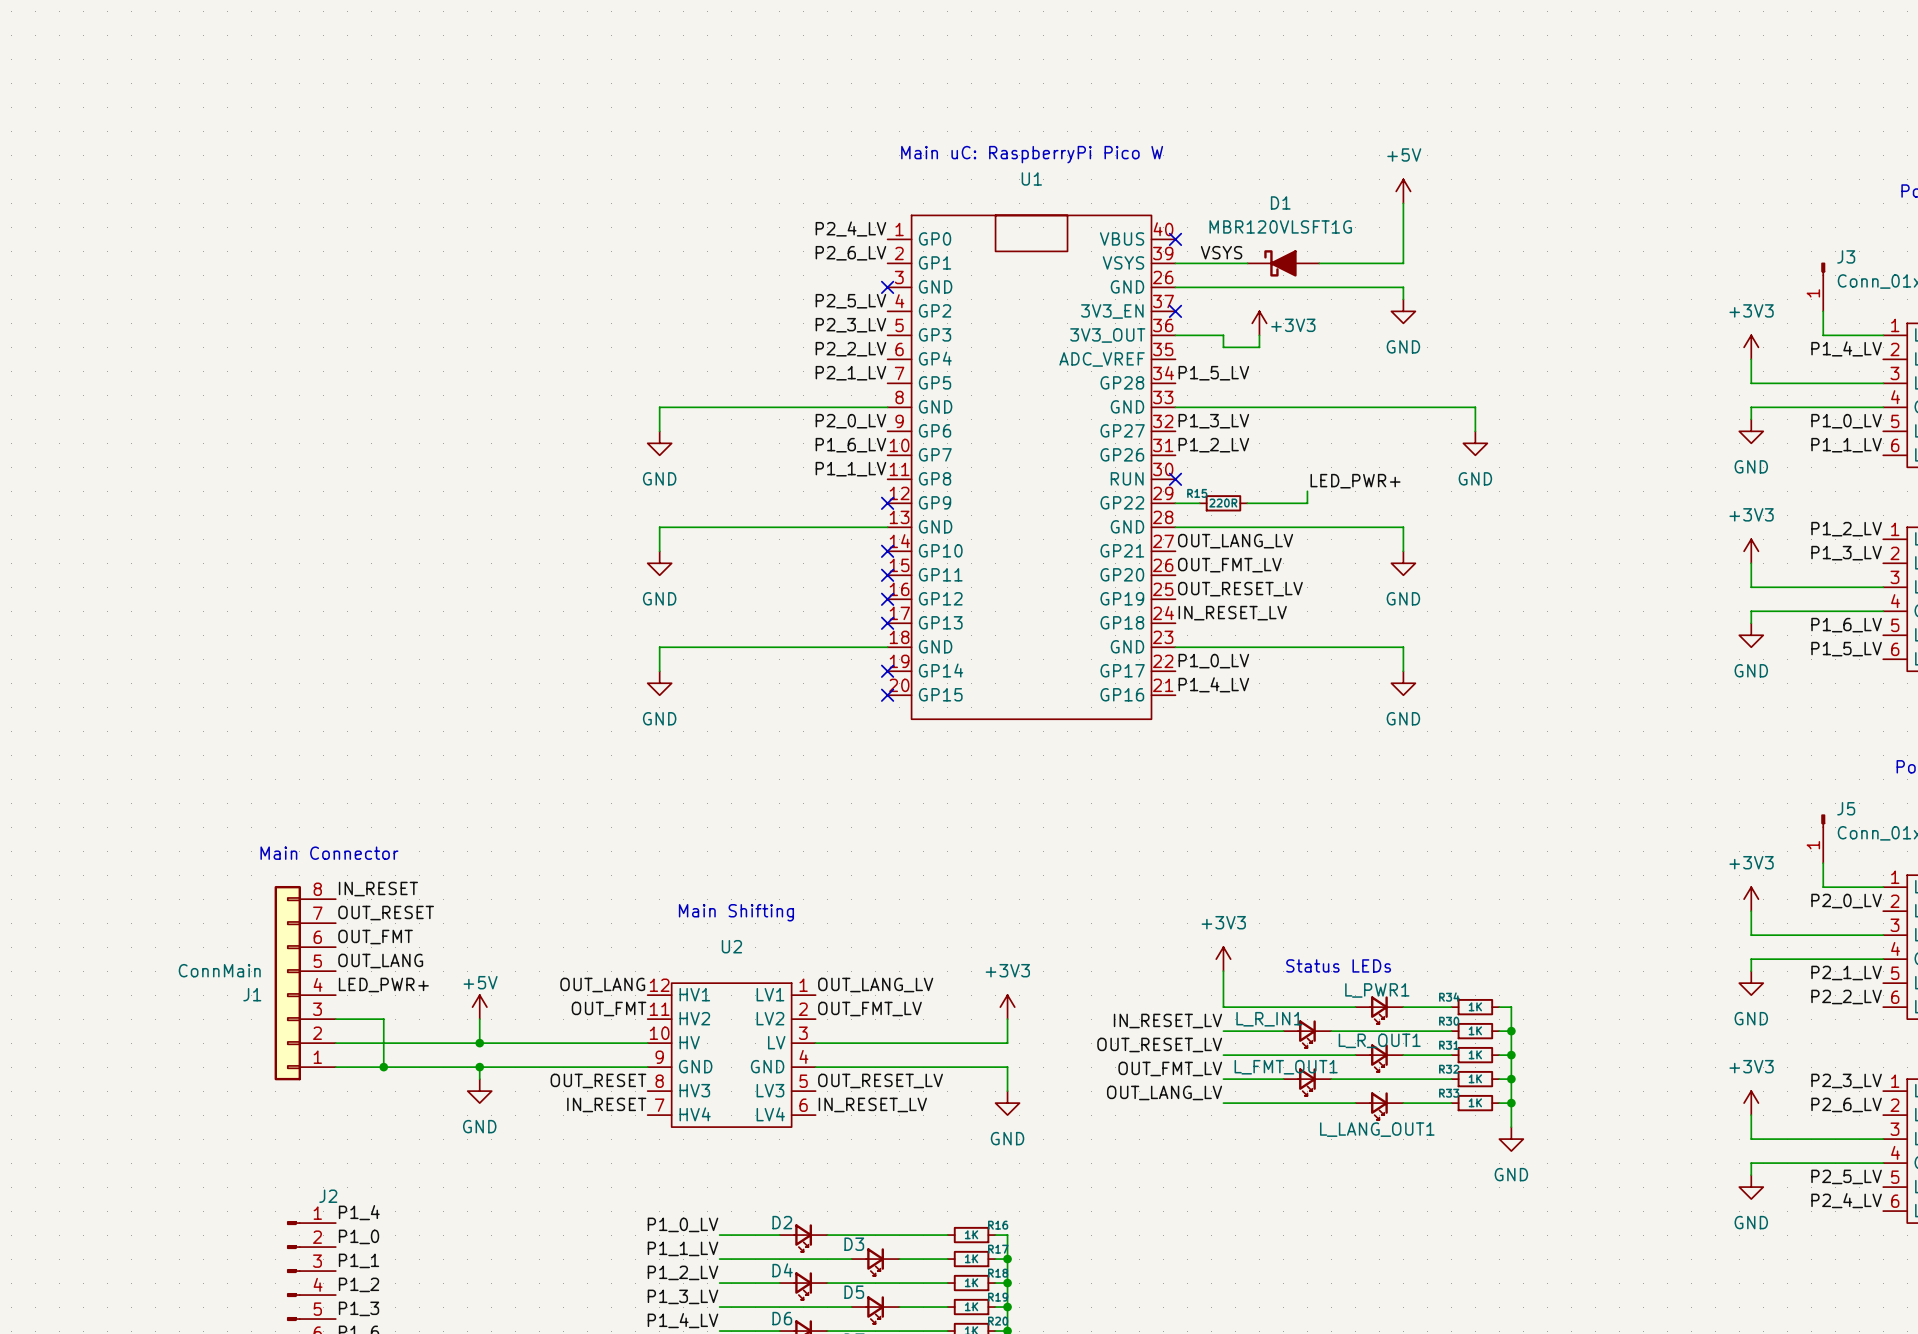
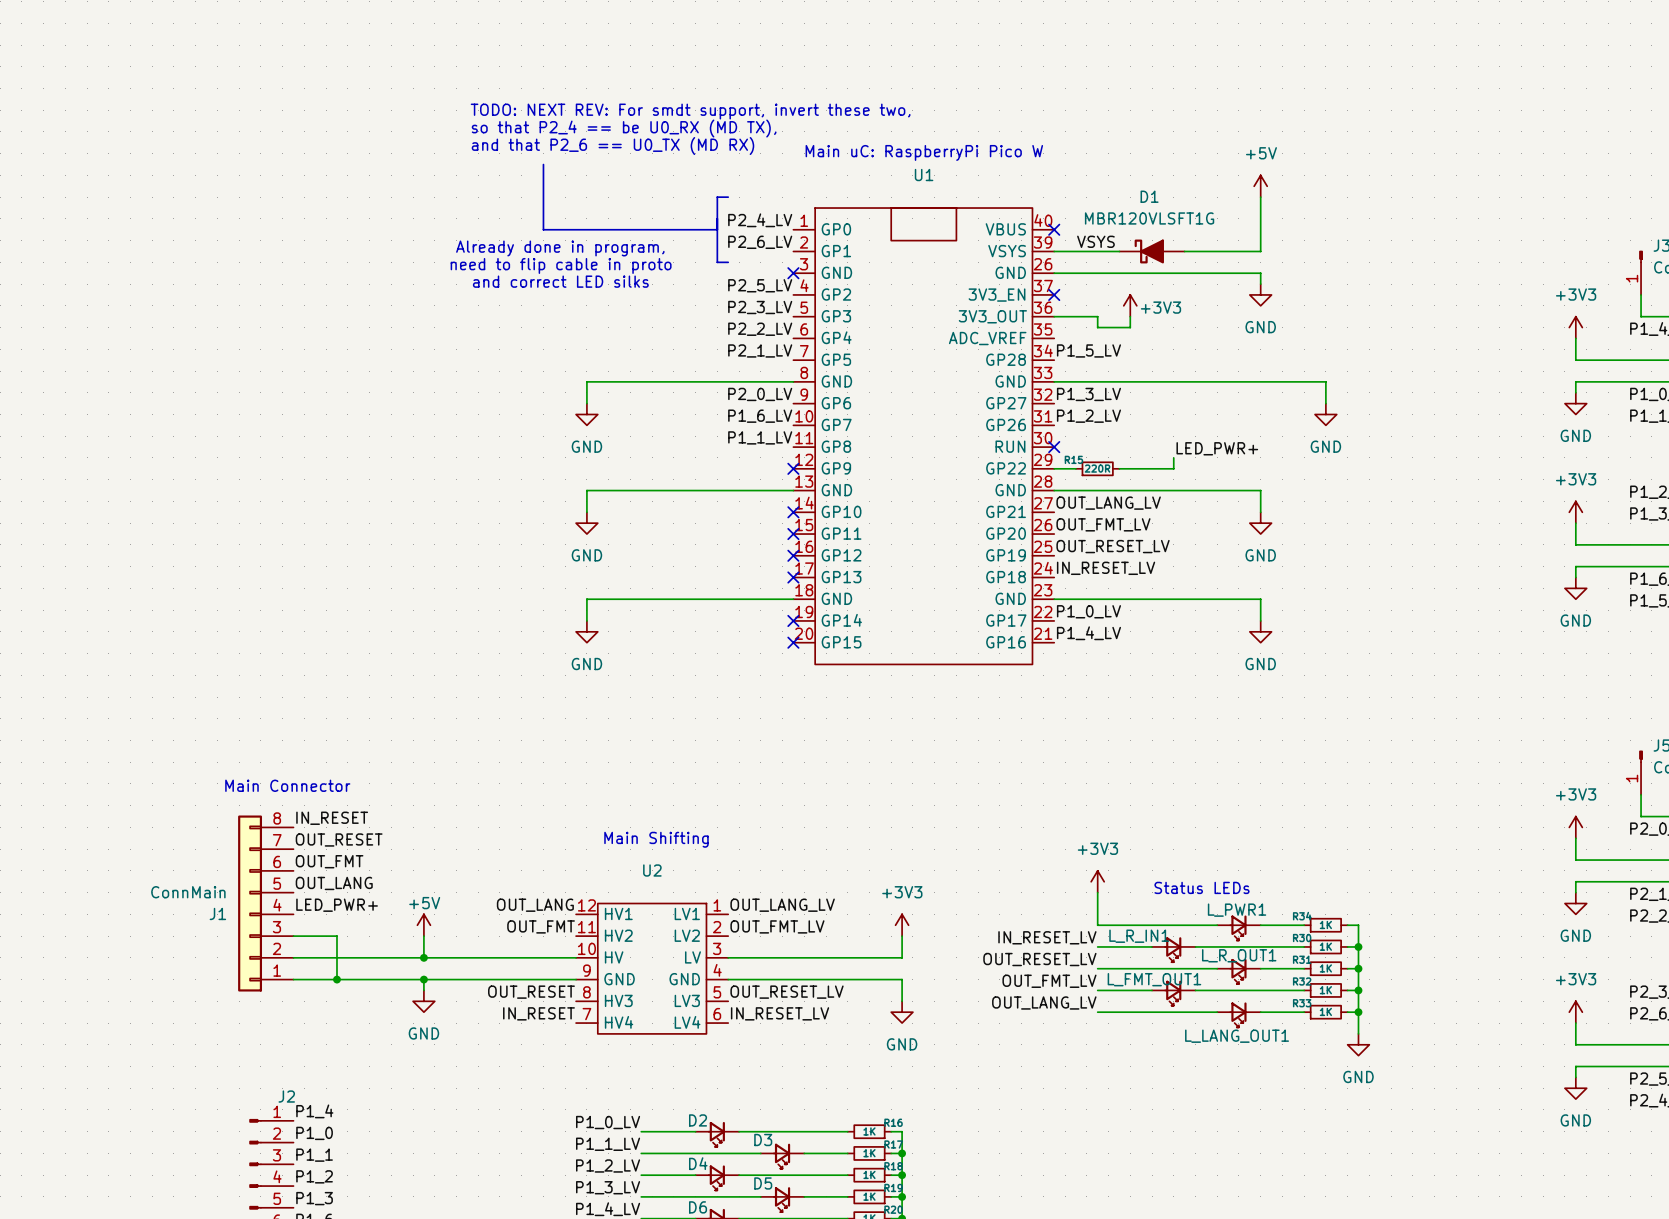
text: none -> TODO: NEXT REV: For smdt support, invert these two, (690, 111)
text: none -> so that P2_4 == be U0_RX (MD TX), (624, 128)
text: none -> and that P2_6 == U0_TX (MD RX) (612, 146)
line: none -> (543, 164) (543, 229) (717, 229)
line: none -> (728, 197) (717, 197) (717, 262) (728, 262)
text: none -> Already done in program, (560, 248)
text: none -> need to flip cable in proto (561, 265)
text: none -> and correct LED silks (560, 281)

